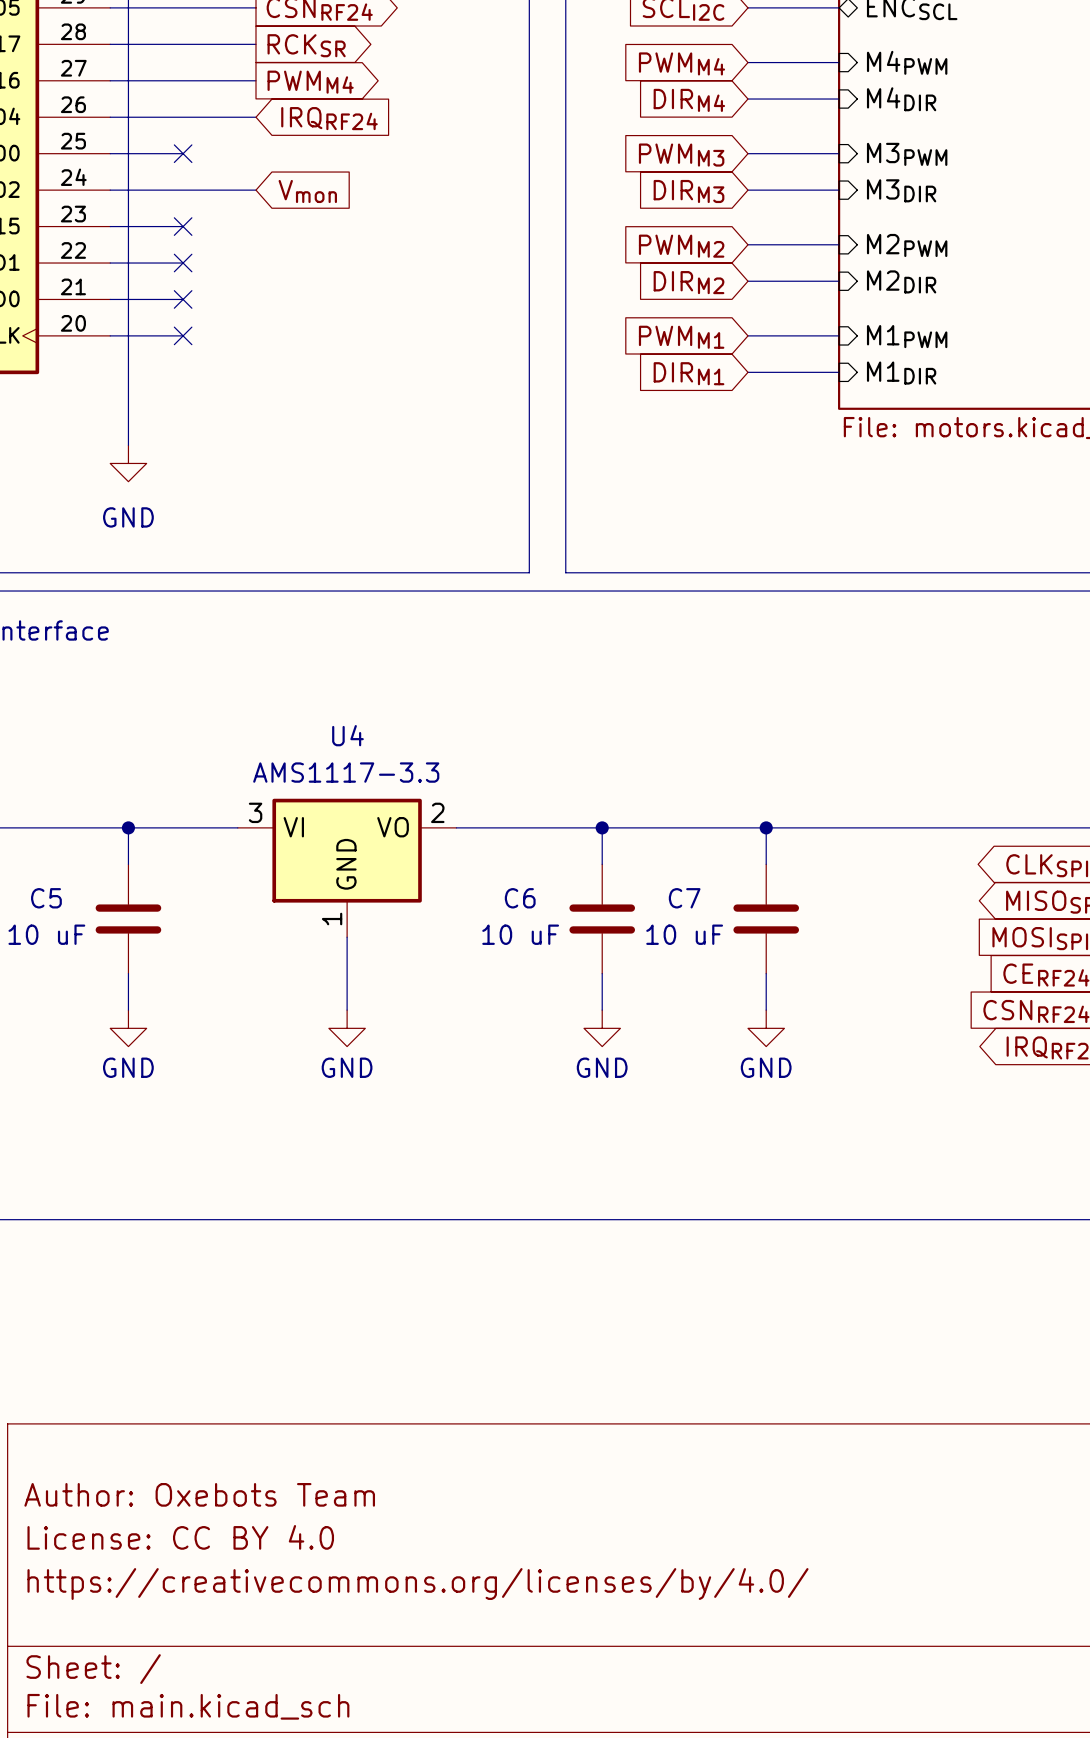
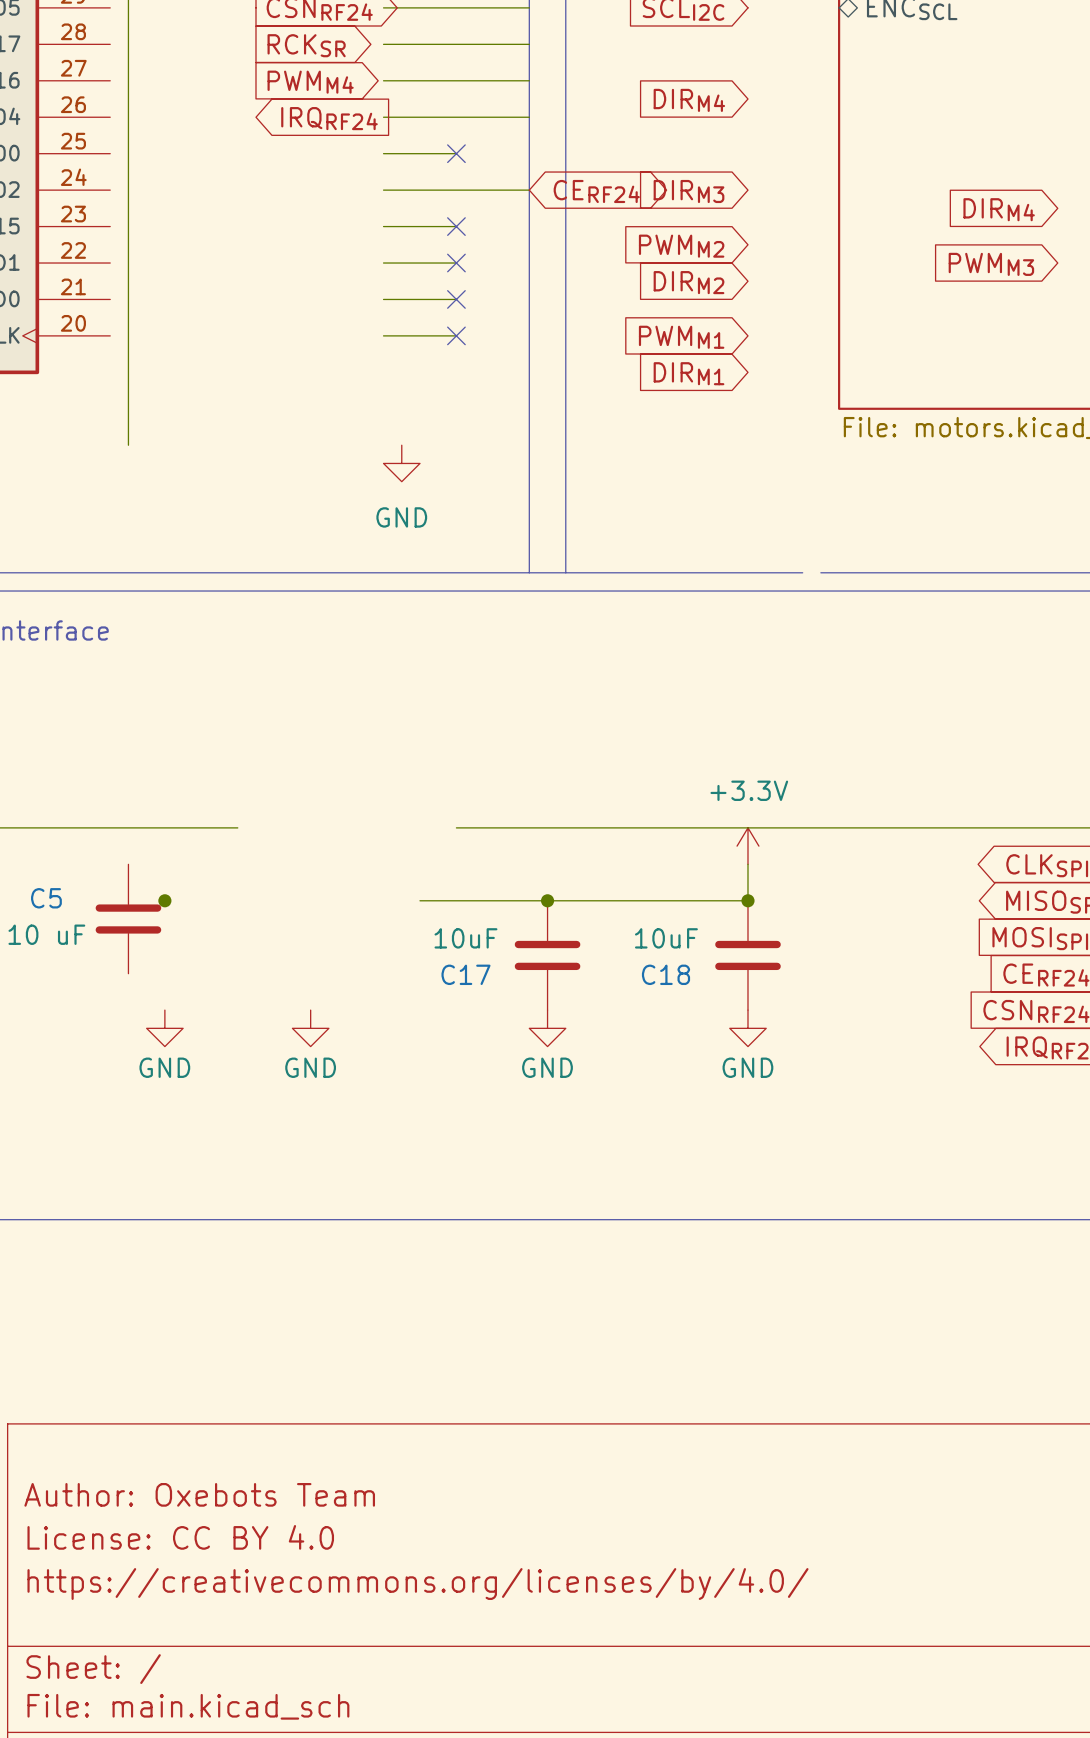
wire: (110, 7) (255, 7) -> (383, 7) (529, 7)
wire: (747, 7) (839, 7) -> none
wire: (110, 44) (255, 44) -> (383, 44) (529, 44)
wire: (747, 62) (839, 62) -> none
sheet pin: M4PWM (907, 62) -> none
global label: PWMM4 (681, 63) -> none
wire: (110, 80) (255, 80) -> (383, 80) (529, 80)
wire: (747, 99) (839, 99) -> none
sheet pin: M4DIR (901, 99) -> none
wire: (110, 117) (255, 117) -> (383, 117) (529, 117)
wire: (110, 153) (183, 153) -> (383, 153) (456, 153)
no-connect mark: (183, 153) -> none
no-connect mark: none -> (456, 153)
wire: (747, 153) (839, 153) -> none
sheet pin: M3PWM (907, 154) -> none
global label position: PWMM3 (681, 155) -> PWMM3 (991, 264)
wire: (110, 190) (255, 190) -> (383, 190) (529, 190)
wire: (747, 190) (839, 190) -> none
sheet pin: M3DIR (901, 190) -> none
global label: Vmon (307, 191) -> none
global label: none -> CERF24 (596, 191)
global label: none -> DIRM4 (999, 209)
wire: (110, 226) (183, 226) -> (383, 226) (456, 226)
no-connect mark: (183, 226) -> none
no-connect mark: none -> (456, 226)
wire: (747, 244) (839, 244) -> none
sheet pin: M2PWM (907, 245) -> none
wire: (110, 263) (183, 263) -> (383, 263) (456, 263)
no-connect mark: (183, 263) -> none
no-connect mark: none -> (456, 263)
wire: (747, 281) (839, 281) -> none
sheet pin: M2DIR (901, 281) -> none
wire: (110, 299) (183, 299) -> (383, 299) (456, 299)
no-connect mark: (183, 299) -> none
no-connect mark: none -> (456, 299)
wire: (110, 335) (183, 335) -> (383, 335) (456, 335)
no-connect mark: (183, 335) -> none
no-connect mark: none -> (456, 335)
wire: (747, 335) (839, 335) -> none
sheet pin: M1PWM (907, 336) -> none
wire: (747, 372) (839, 372) -> none
sheet pin: M1DIR (901, 373) -> none
power symbol: GND (128, 463) -> none
power symbol: none -> GND (401, 463)
line: none -> (529, 572) (565, 572)
line: (802, 572) (820, 572) -> none
wire: (128, 827) (128, 864) -> none
junction: (128, 827) -> none
wire: (602, 827) (602, 864) -> none
junction: (602, 827) -> none
wire: (766, 827) (766, 864) -> none
junction position: (766, 827) -> (747, 900)
power symbol: none -> +3.3V (747, 846)
wire: none -> (747, 864) (747, 900) (419, 900)
U4: AMS1117-3.3 (347, 867) -> none
junction: none -> (164, 900)
junction: none -> (547, 900)
C6: 10 uF (602, 919) -> none
C7: 10 uF (766, 919) -> none
wire: (347, 937) (347, 1010) -> none
C17: none -> 10uF (547, 955)
C18: none -> 10uF (747, 955)
wire: (128, 973) (128, 1010) -> none
wire: (602, 973) (602, 1010) -> none
wire: (766, 973) (766, 1010) -> none
power symbol position: GND (128, 1028) -> GND (164, 1028)
power symbol position: GND (347, 1028) -> GND (310, 1028)
power symbol position: GND (602, 1028) -> GND (547, 1028)
power symbol position: GND (766, 1028) -> GND (747, 1028)

